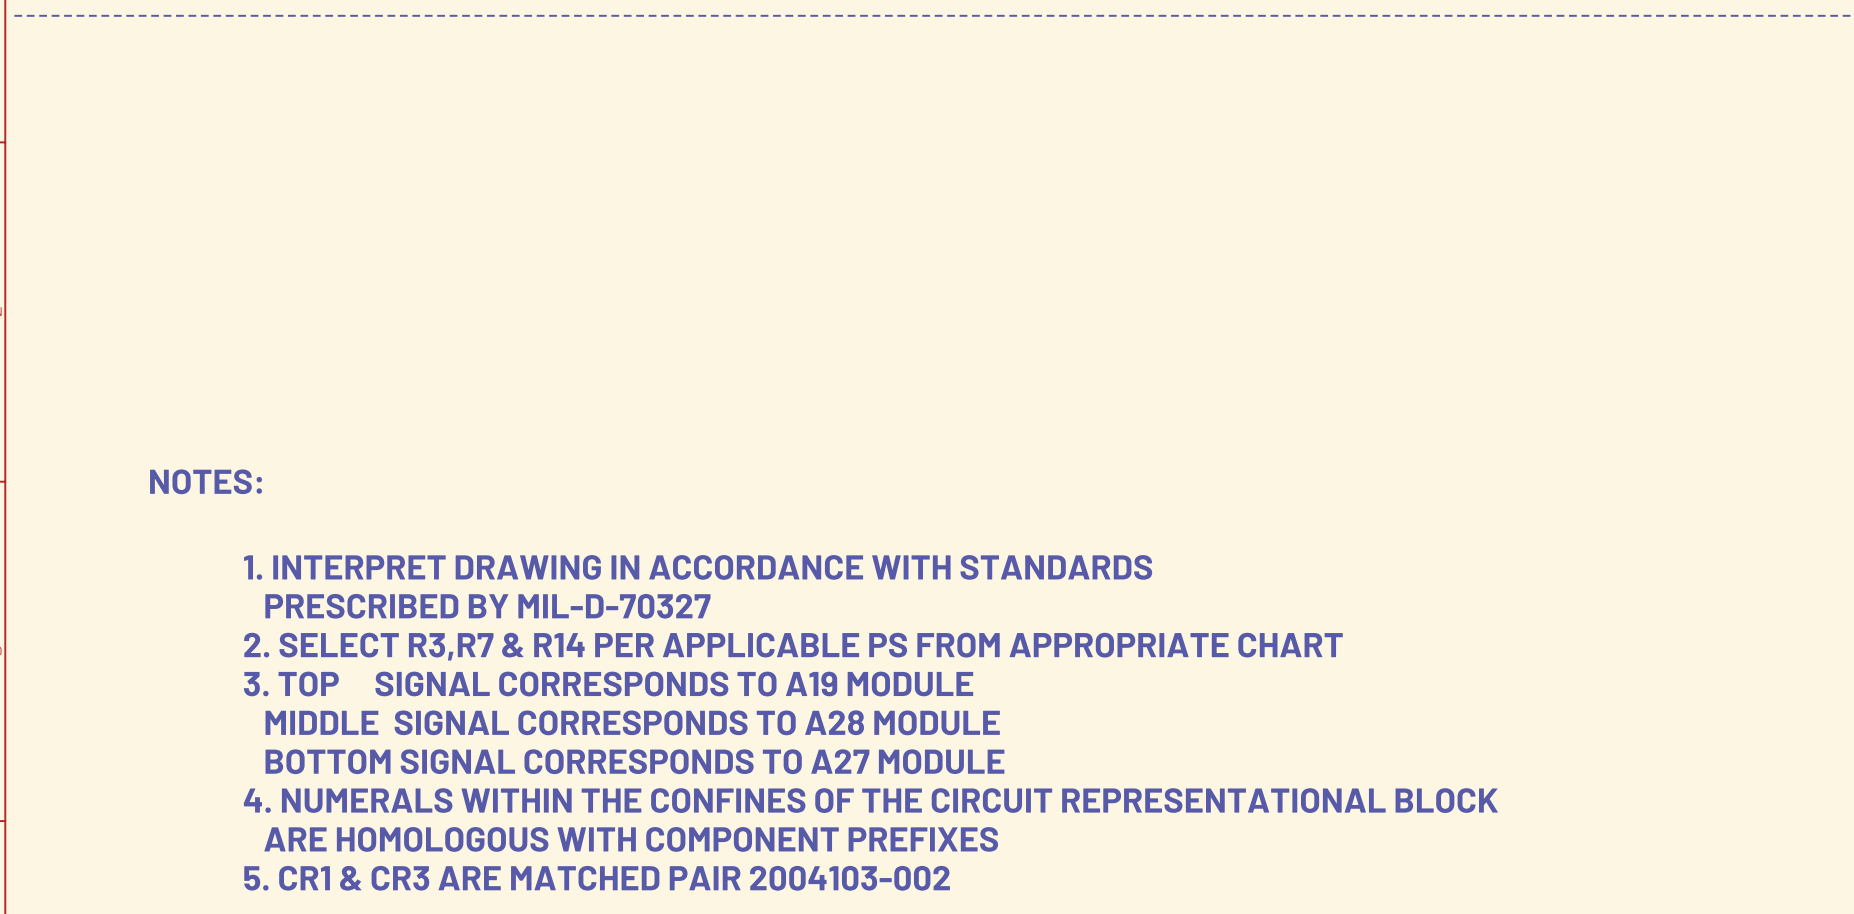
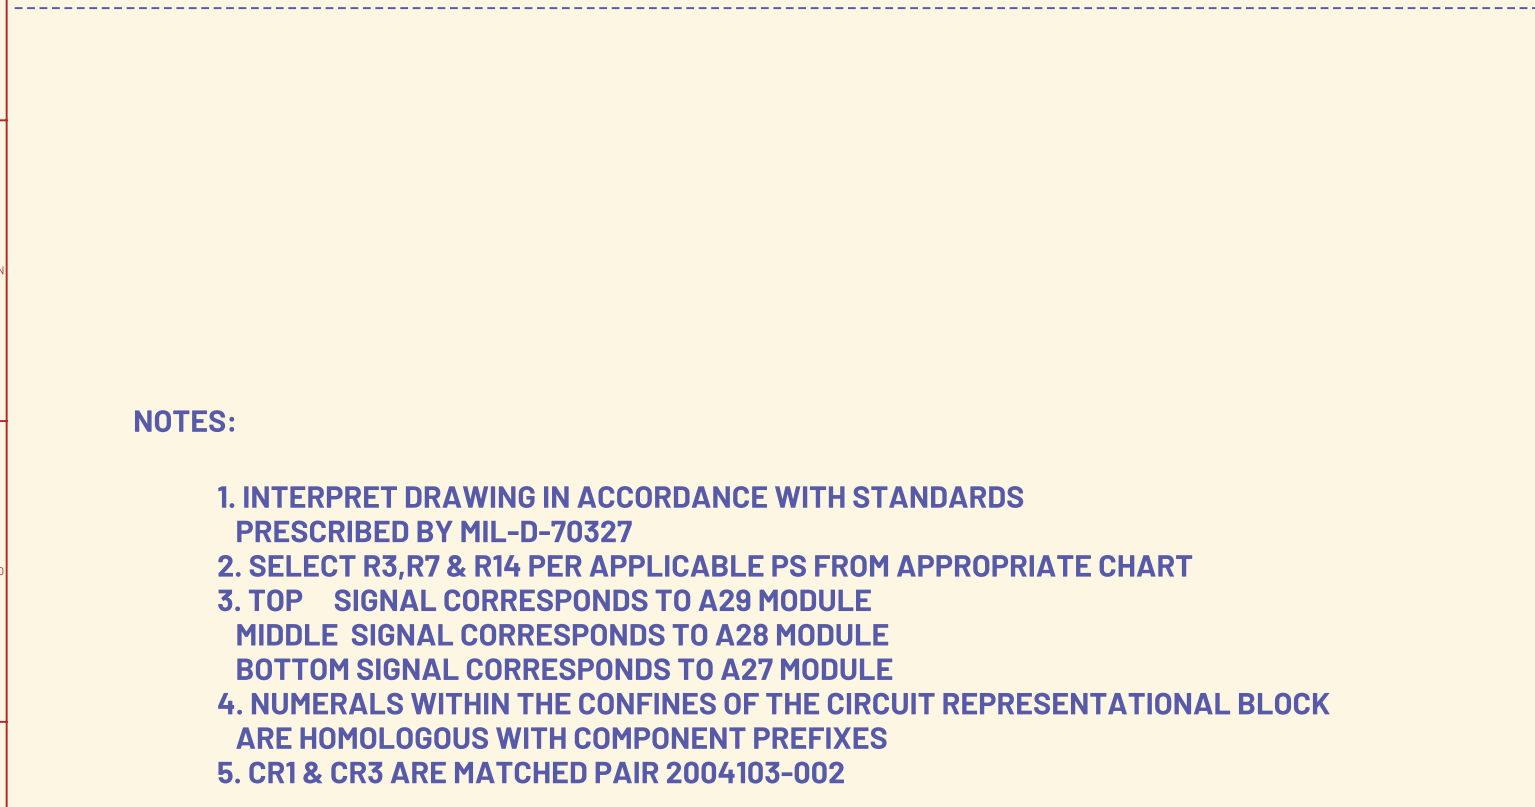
text: 3. TOP SIGNAL CORRESPONDS TO A19 MODULE (608, 684) -> 3. TOP SIGNAL CORRESPONDS TO A29 MODULE (544, 600)

